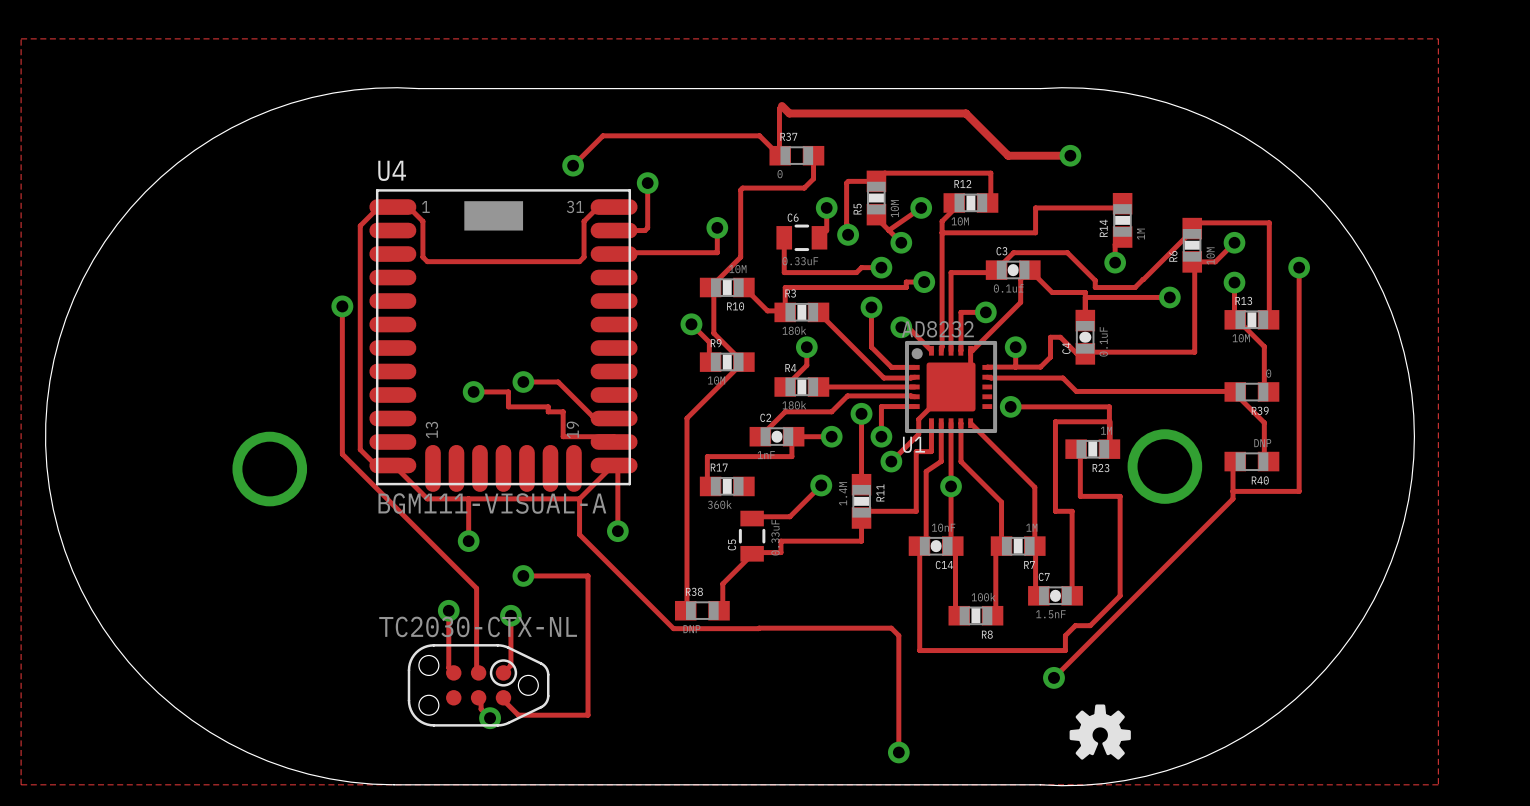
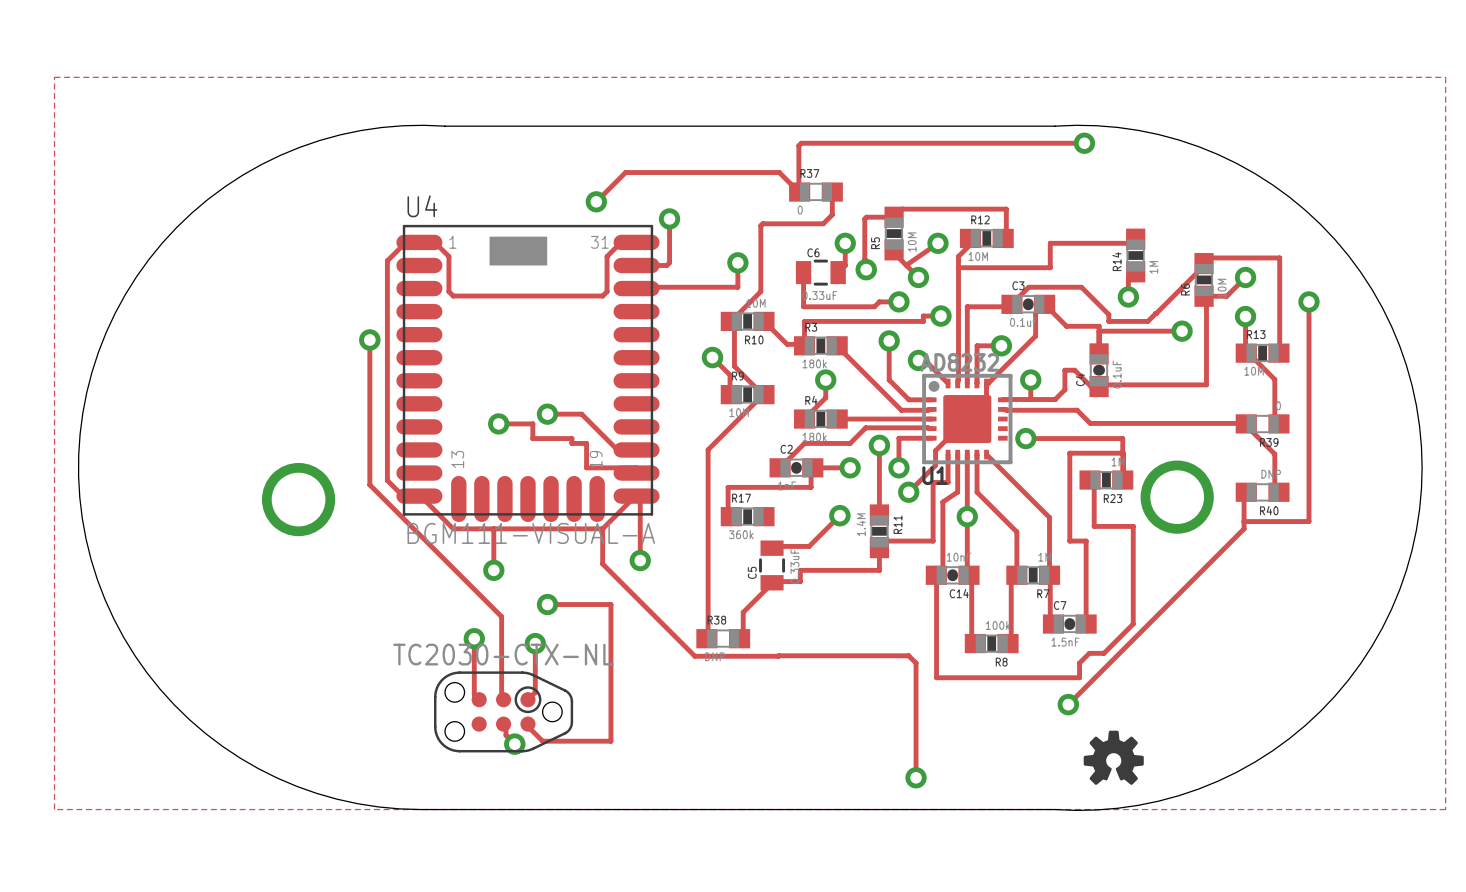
track: (781, 106) (789, 113) (965, 113) (1008, 155) (1070, 155) -> (801, 143) (1084, 143)
via position: (1070, 155) -> (1084, 143)

